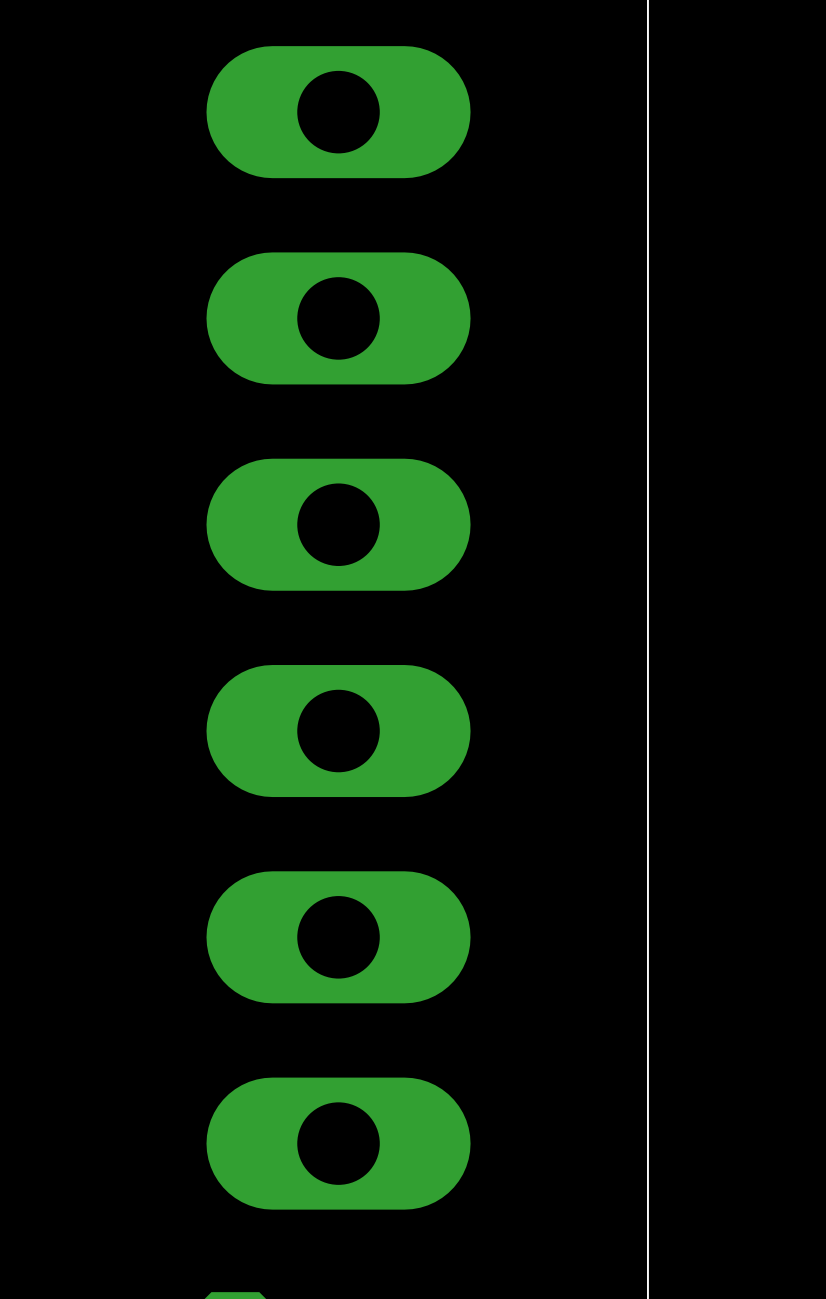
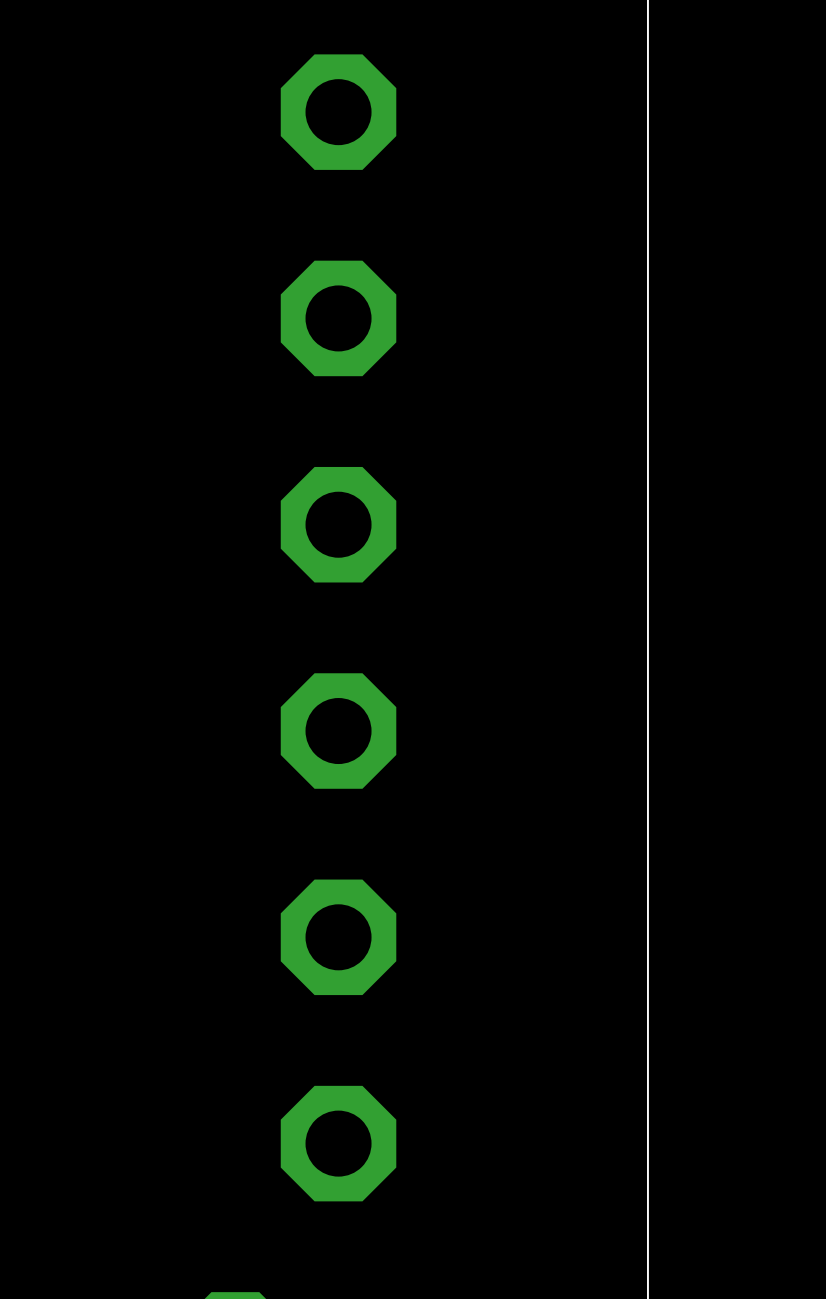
part footprint: [206, 46, 471, 1210] -> [280, 466, 397, 789]
part: none -> (338, 215)
part: none -> (338, 1040)

